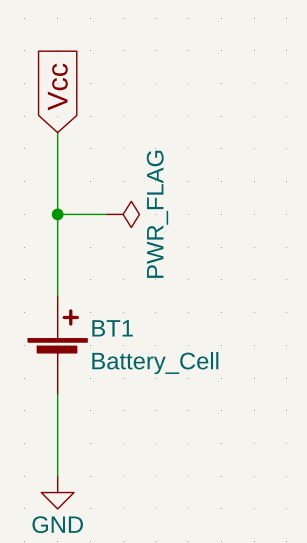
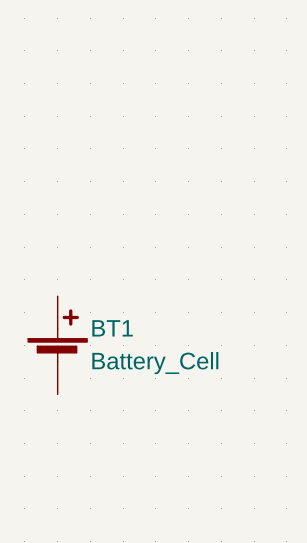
global label: Vcc (57, 87) -> none
wire: (57, 132) (57, 296) -> none
wire: (57, 214) (106, 214) -> none
junction: (57, 214) -> none
power symbol: PWR_FLAG (123, 214) -> none
wire: (57, 394) (57, 476) -> none
power symbol: GND (57, 492) -> none

